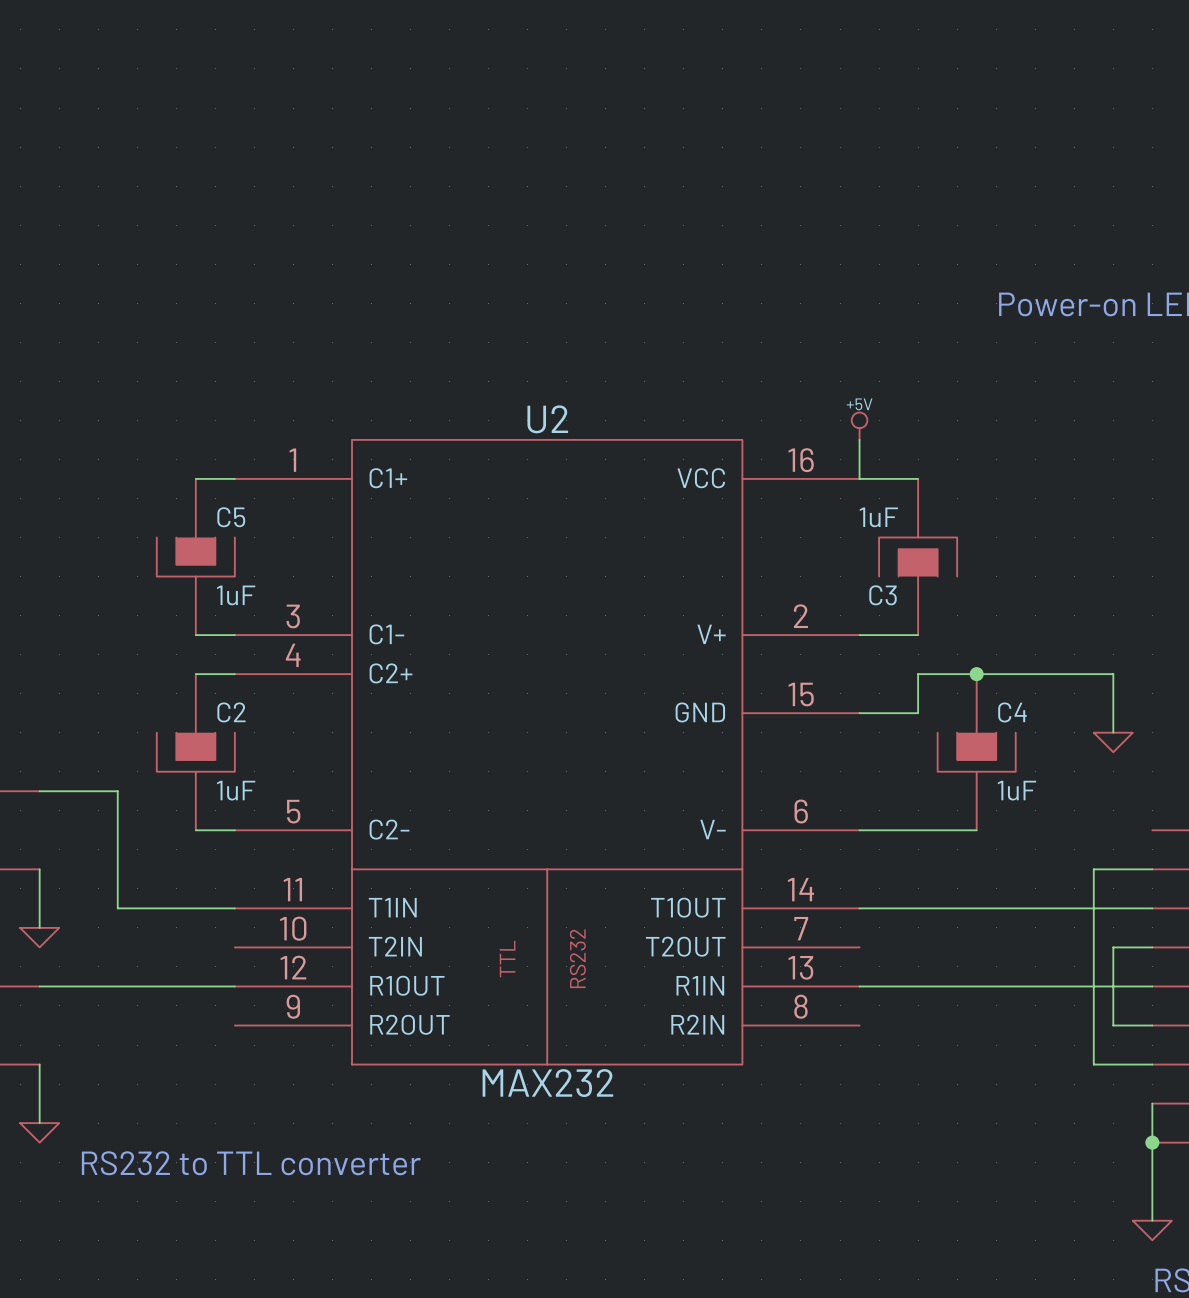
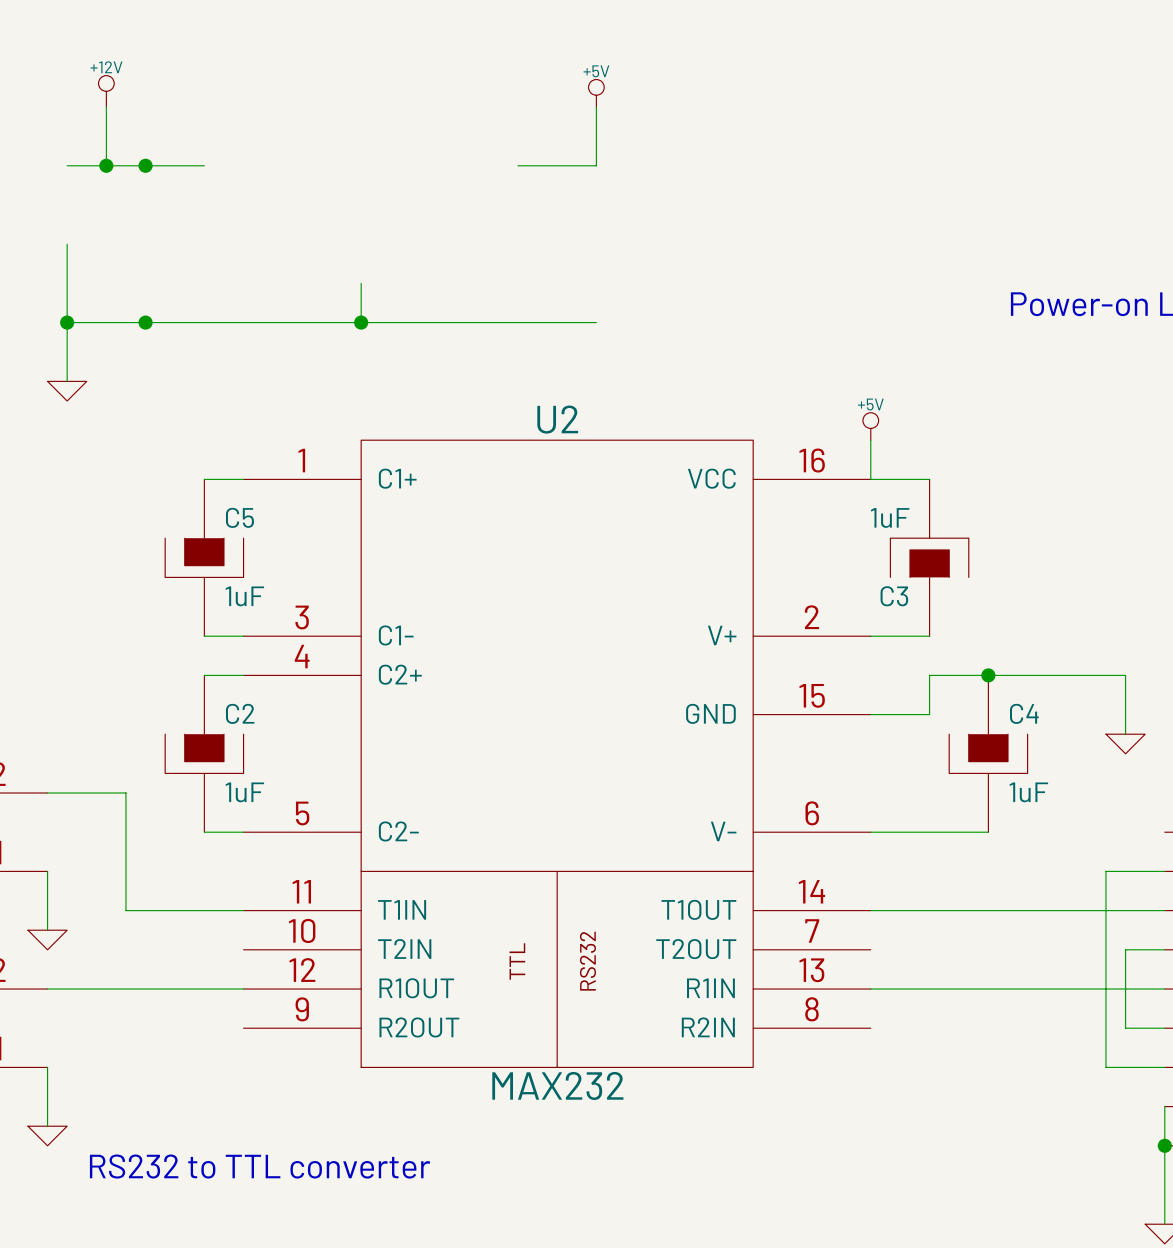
power symbol: none -> +12V (106, 91)
power symbol: none -> +5V (596, 93)
wire: none -> (106, 106) (106, 165)
wire: none -> (596, 106) (596, 165) (517, 165)
wire: none -> (67, 165) (204, 165)
junction: none -> (106, 165)
junction: none -> (145, 165)
wire: none -> (67, 244) (67, 381)
wire: none -> (361, 283) (361, 322)
wire: none -> (67, 322) (596, 322)
junction: none -> (67, 322)
junction: none -> (145, 322)
junction: none -> (361, 322)
power symbol: none -> (67, 391)

